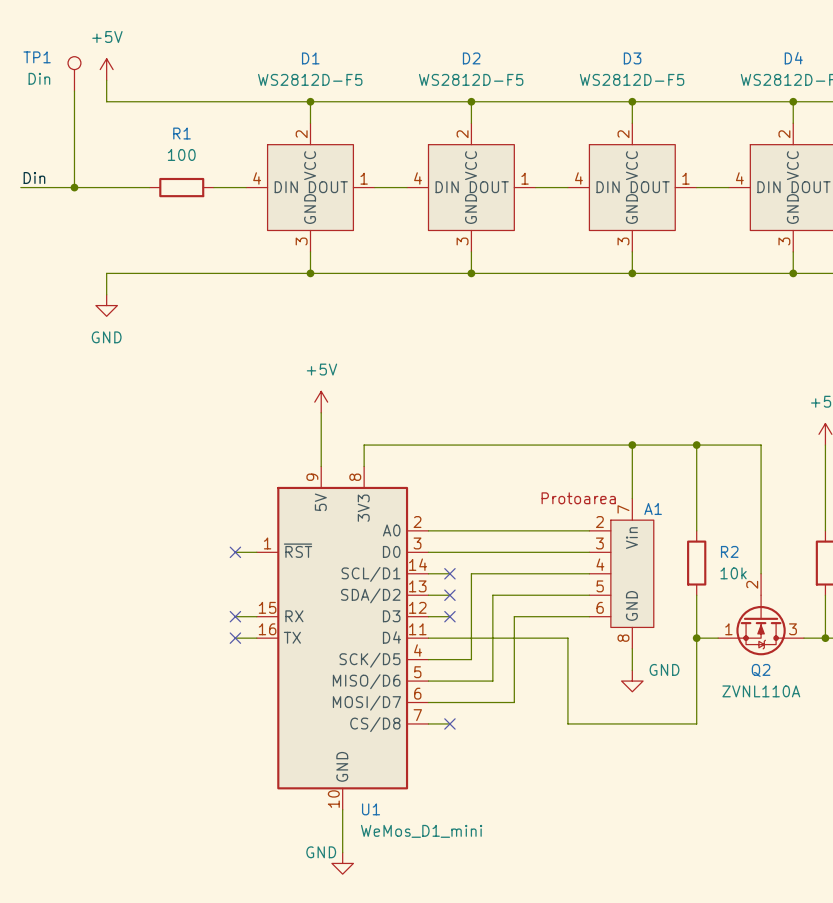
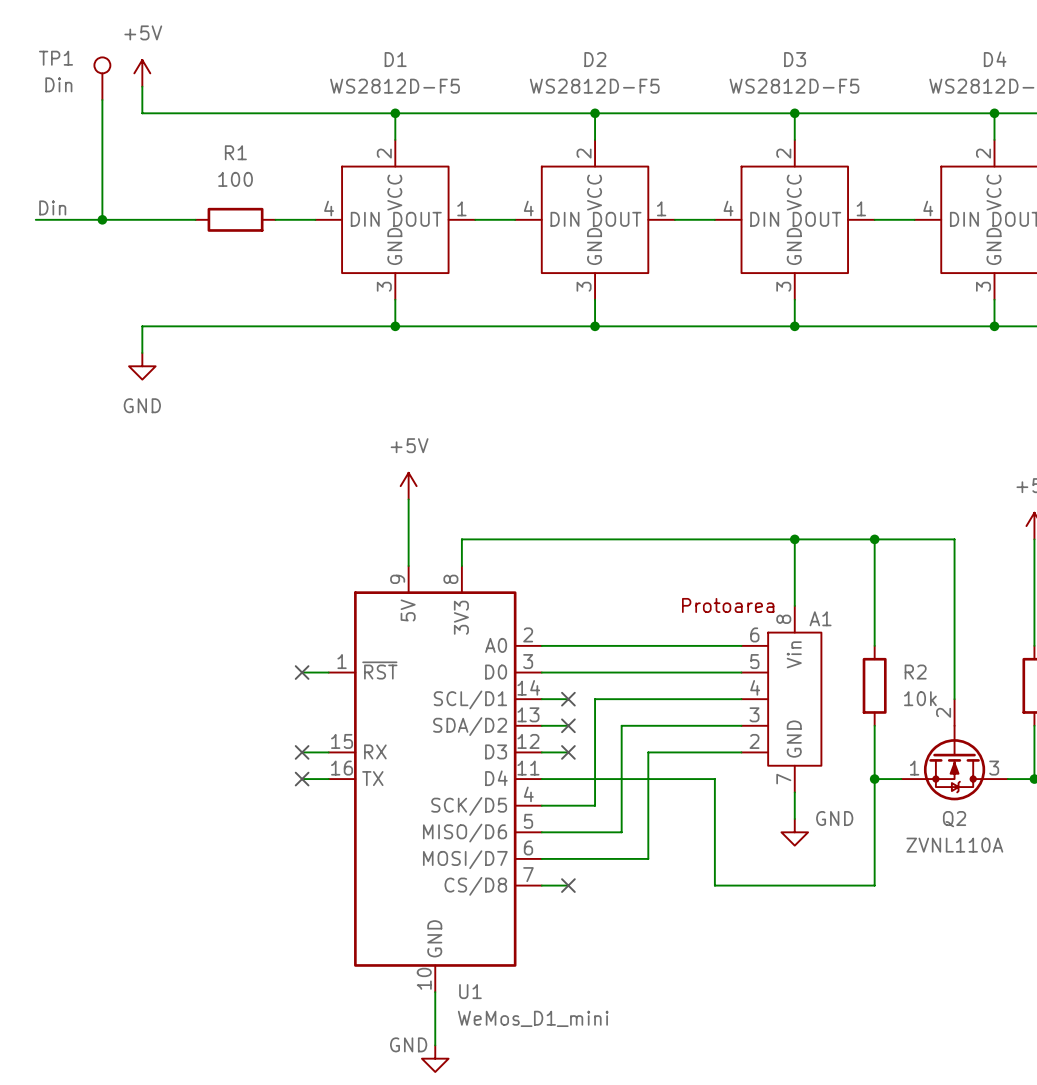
A1 pin number: 7 (623, 509) -> 8 (783, 619)
A1 pin number: 2 (599, 522) -> 6 (754, 634)
A1 pin number: 3 (599, 543) -> 5 (754, 661)
A1 pin number: 5 (600, 586) -> 3 (754, 714)
A1 pin number: 6 (600, 607) -> 2 (754, 741)
A1 pin number: 8 (623, 638) -> 7 (783, 779)

